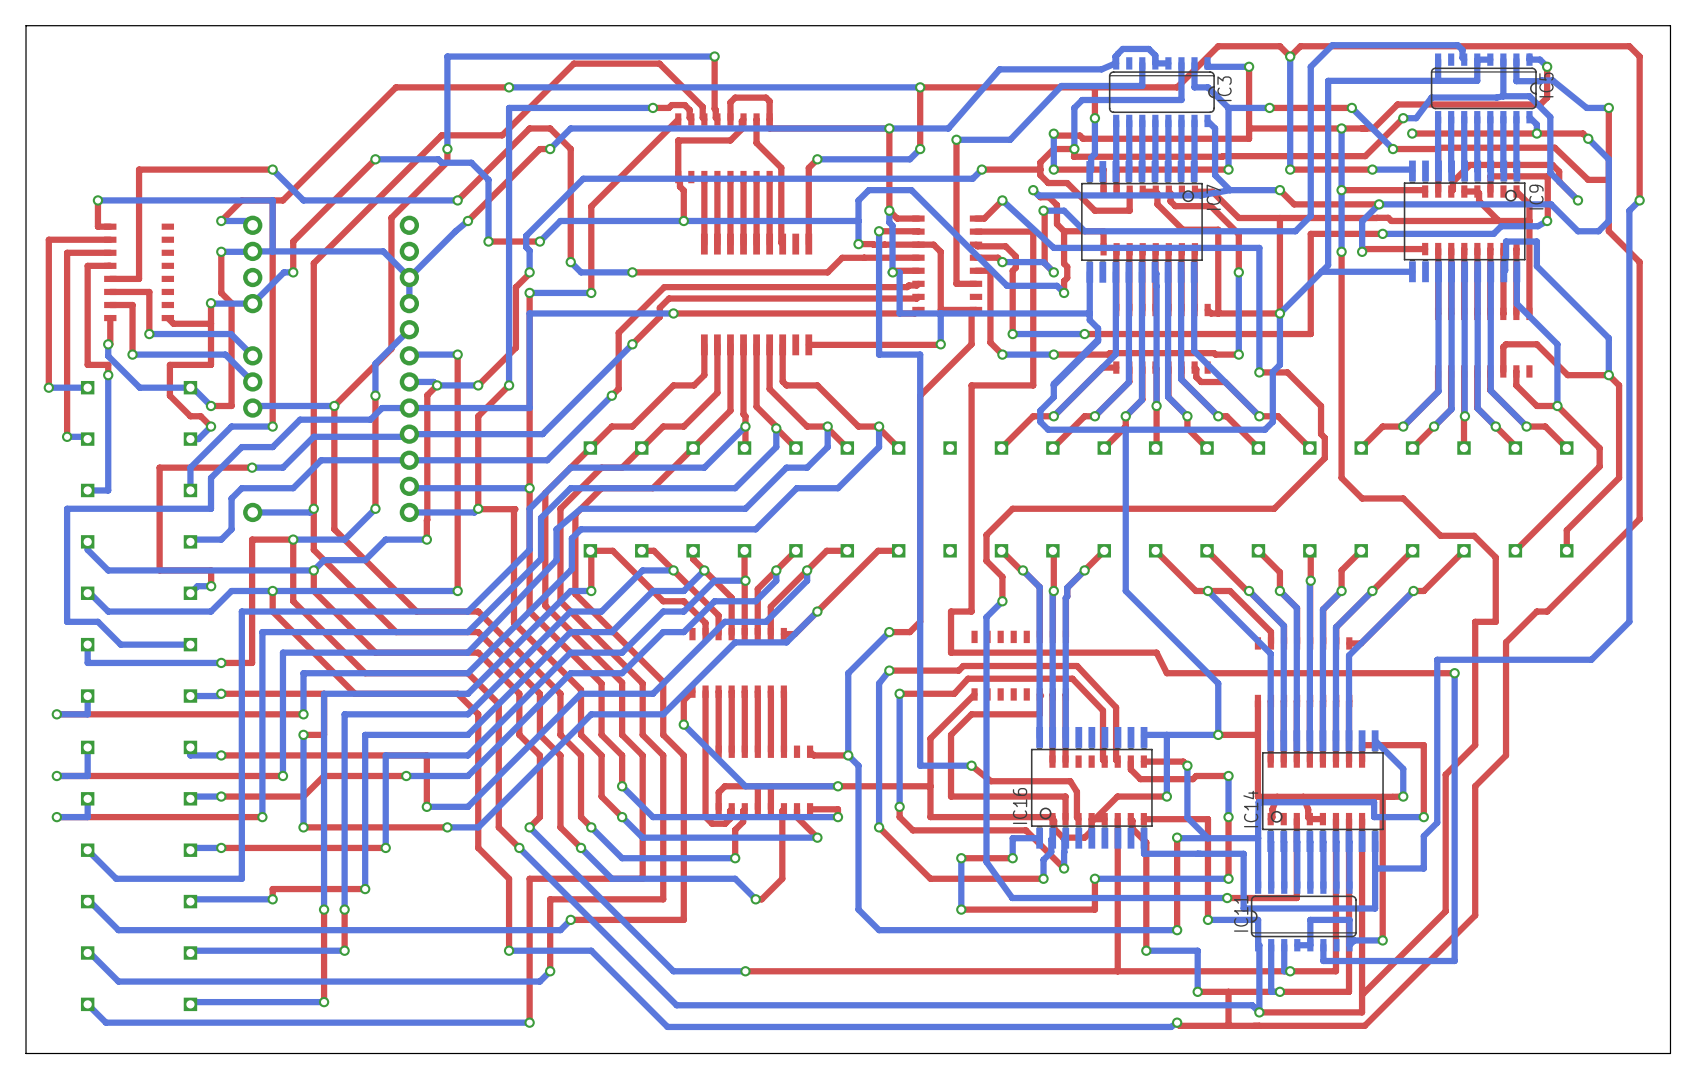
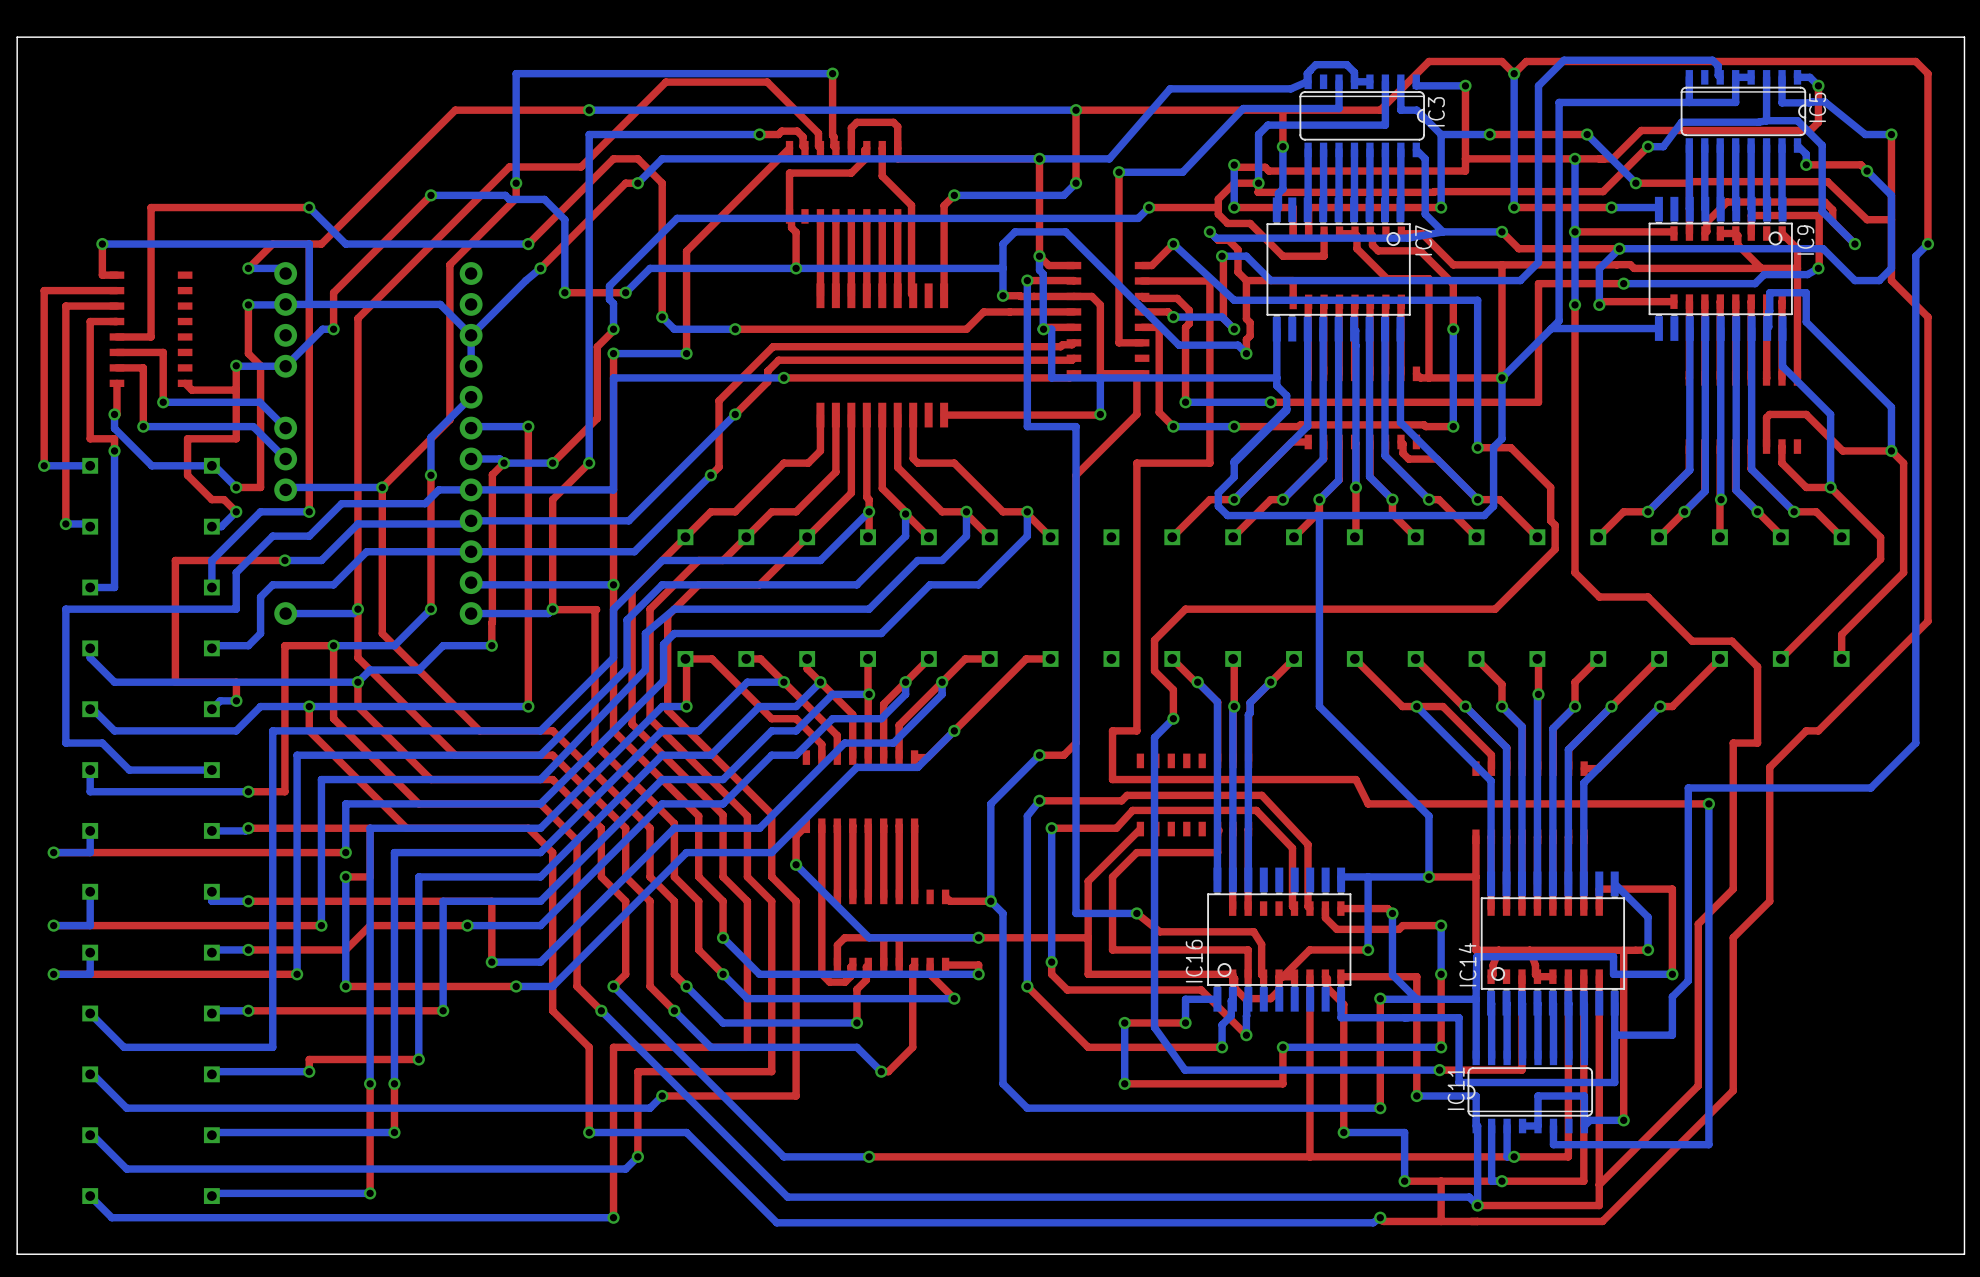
via: (1412, 133) -> none
top track: (1536, 133) (1412, 133) -> none

